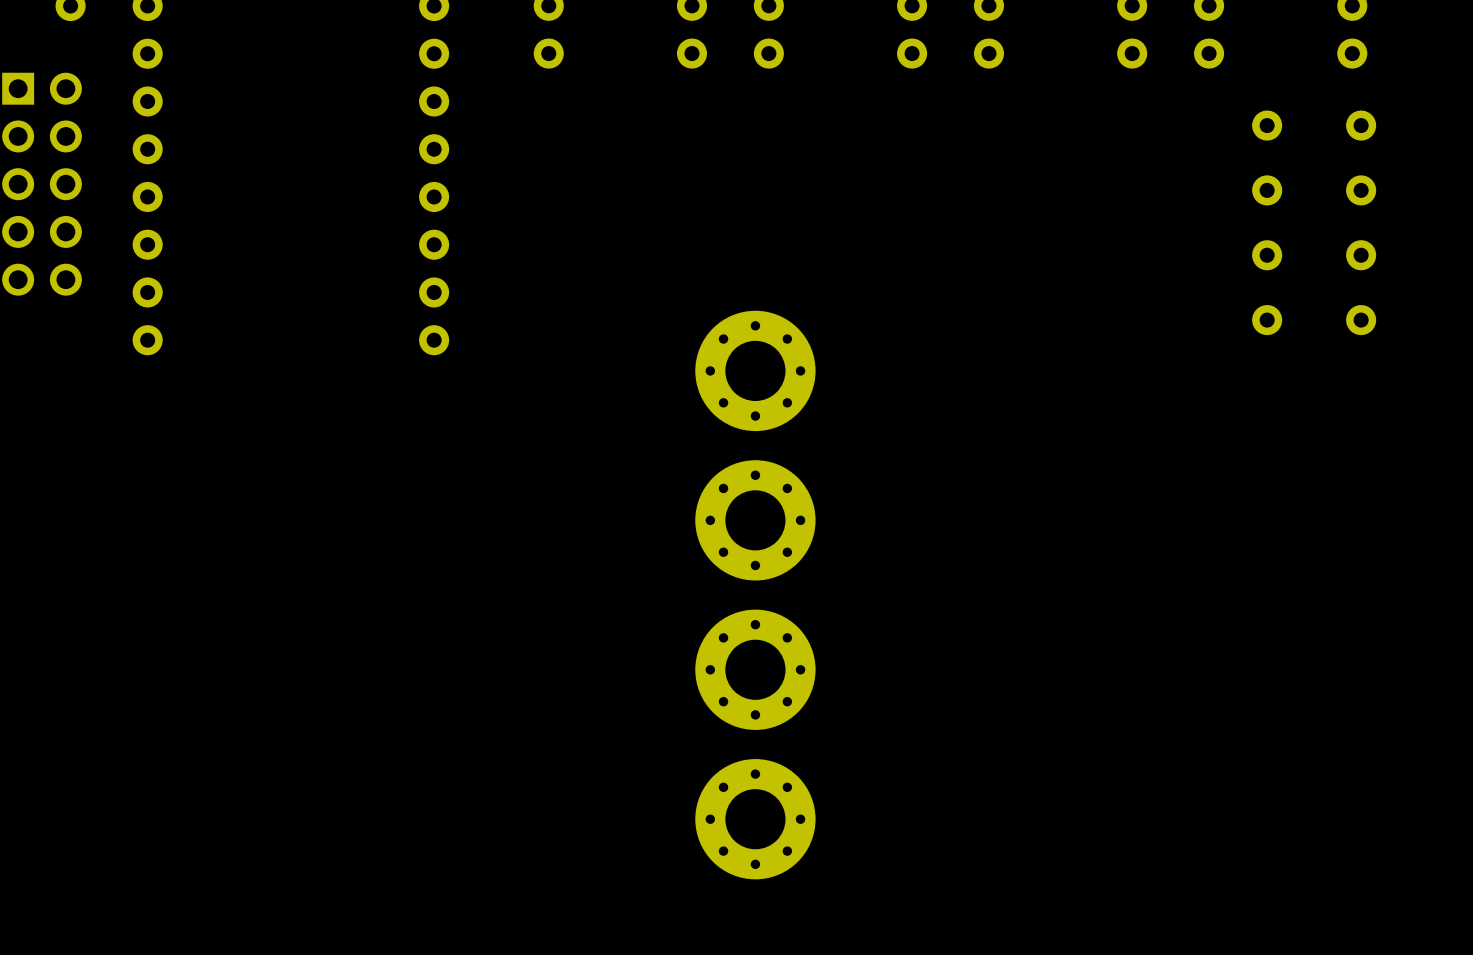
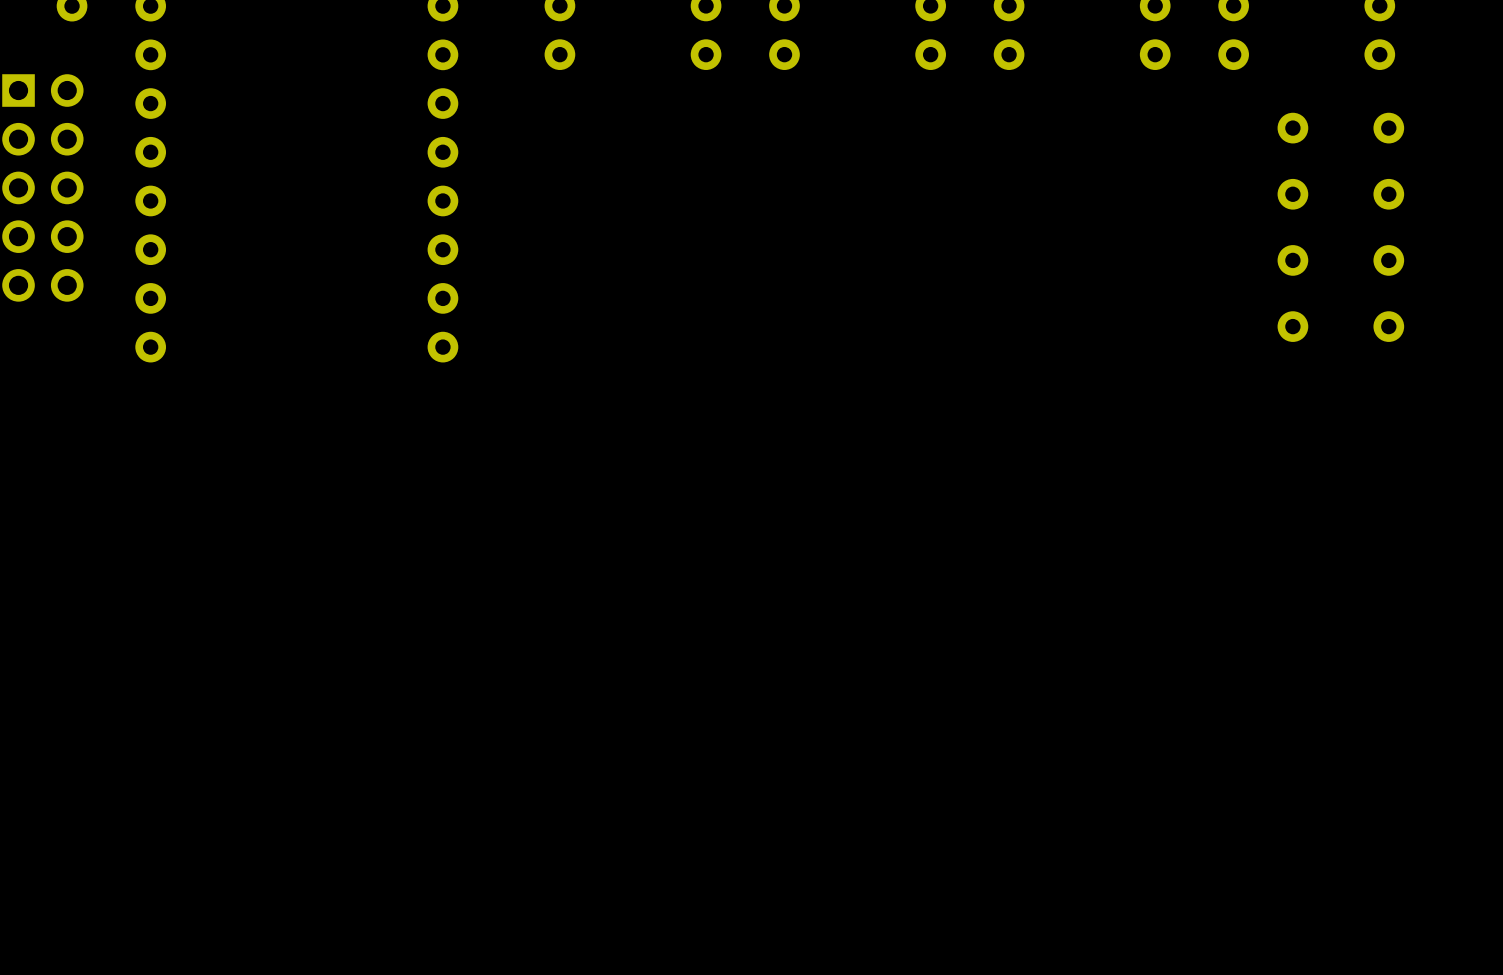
part: (755, 370) -> none
part: (755, 520) -> none
part: (755, 669) -> none
part: (755, 819) -> none

